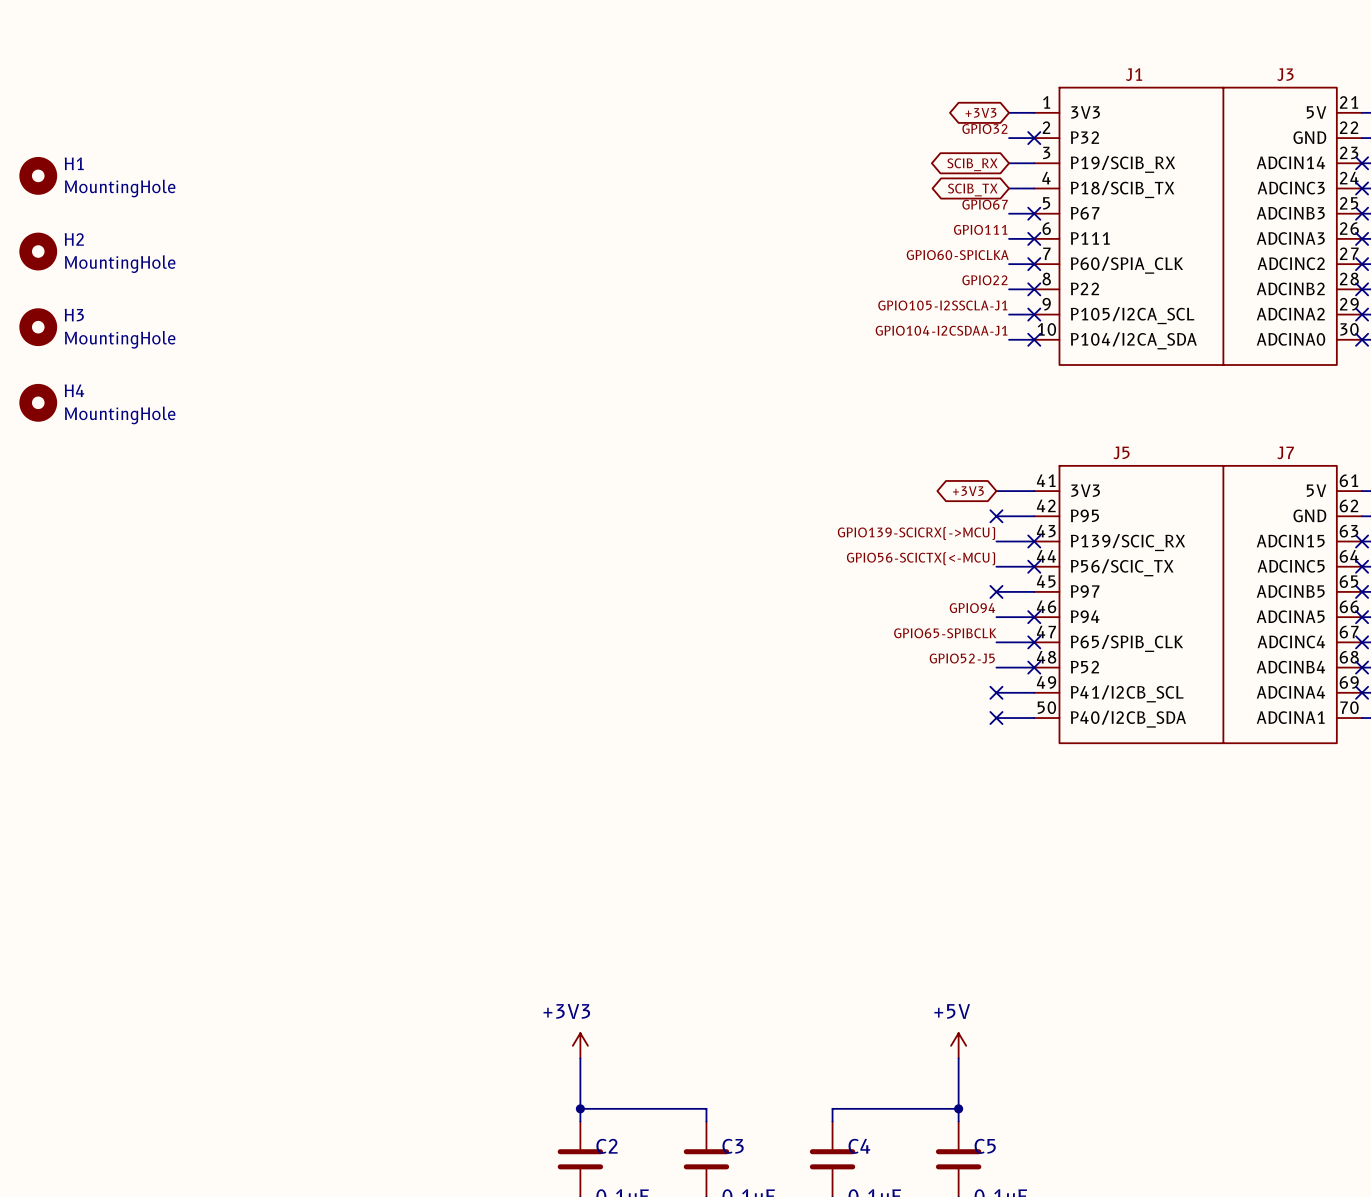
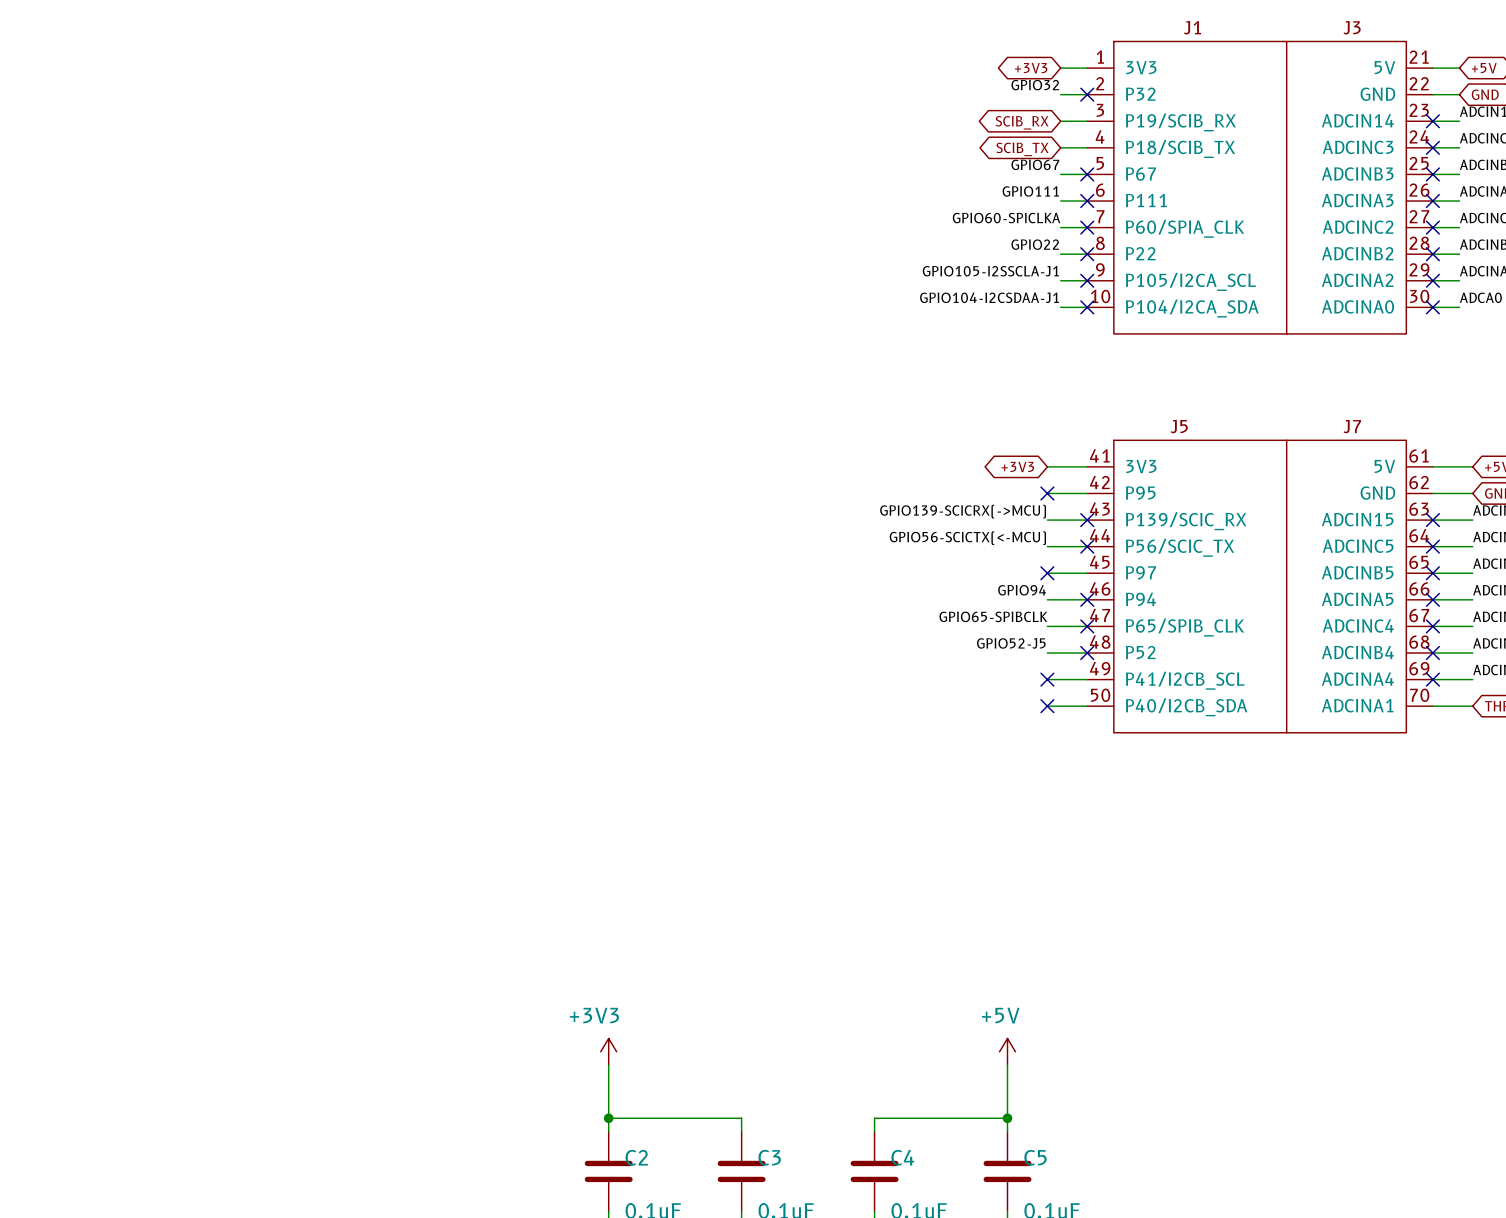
H1: MountingHole (38, 175) -> none
H2: MountingHole (38, 251) -> none
H3: MountingHole (38, 327) -> none
H4: MountingHole (38, 402) -> none

